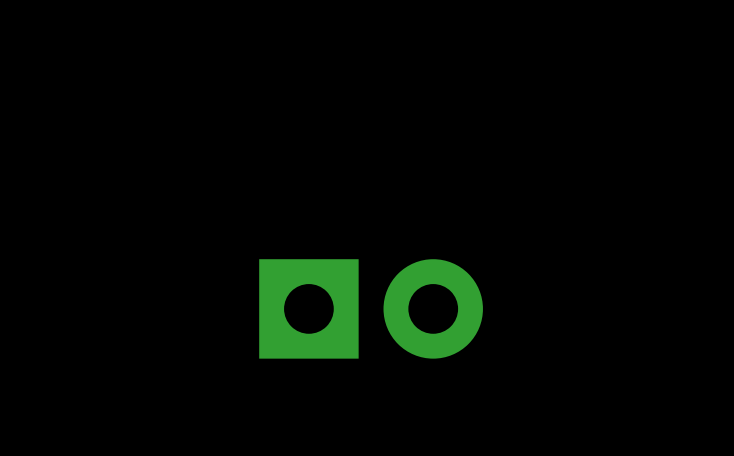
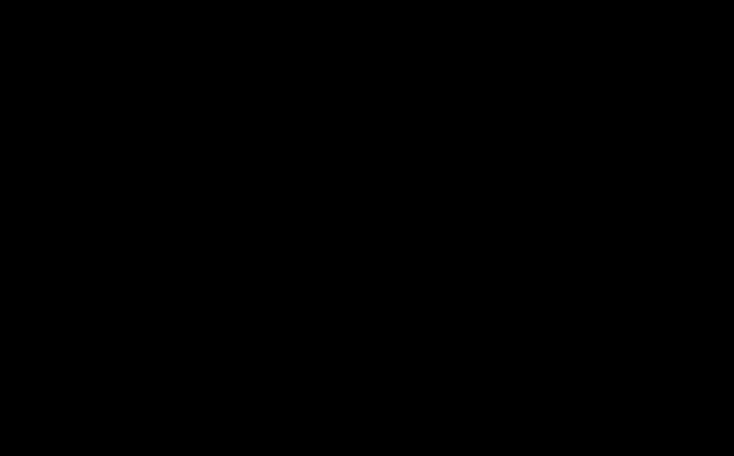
part: (371, 308) -> none

